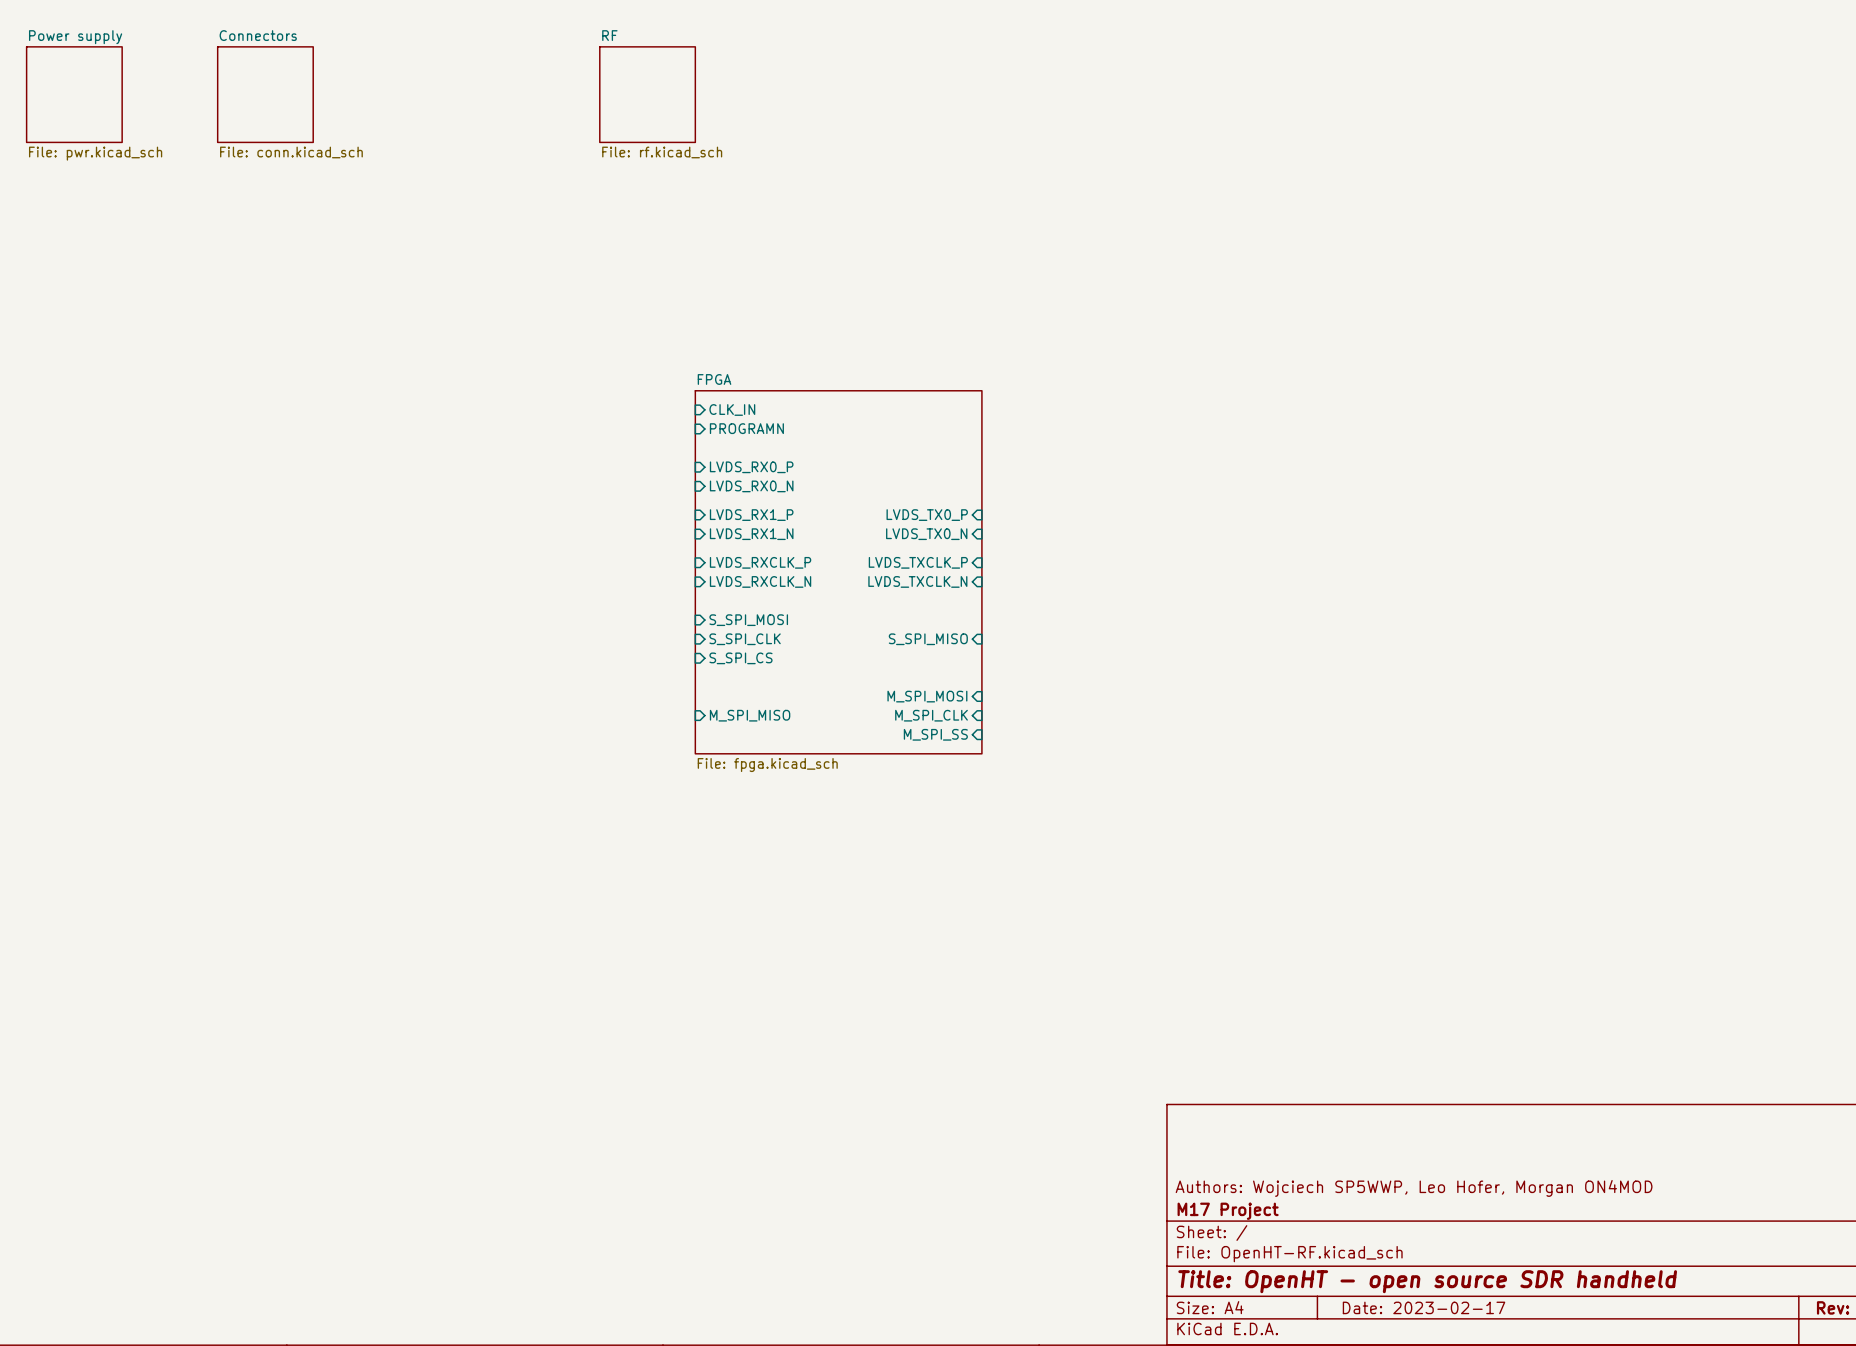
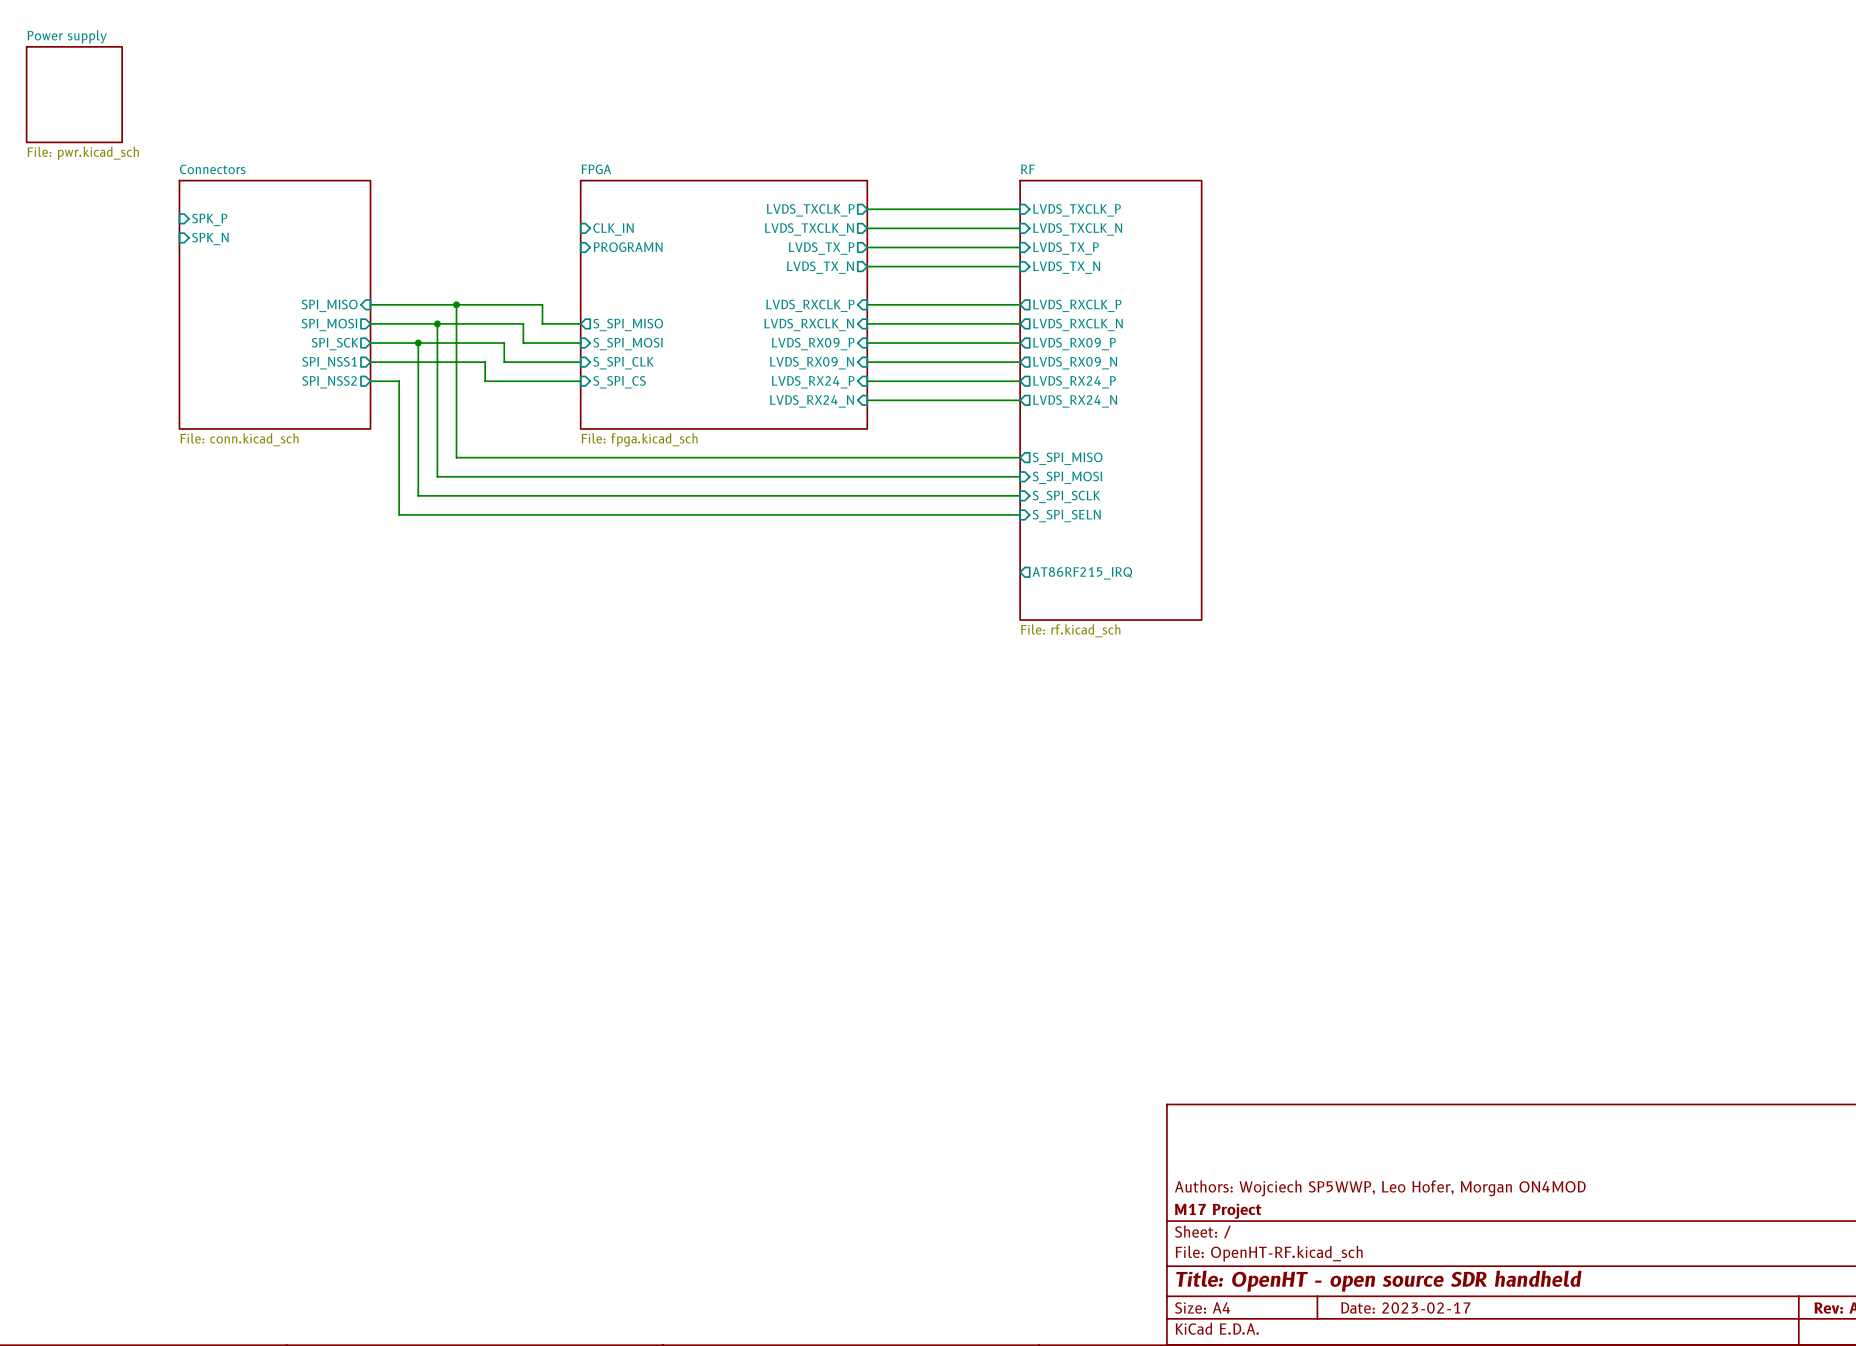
sheet Connectors: File: conn.kicad_sch (265, 94) -> none
sheet RF: File: rf.kicad_sch (647, 94) -> none
sheet pin: none -> LVDS_TXCLK_P (810, 210)
wire: none -> (867, 209) (1020, 209)
sheet pin: none -> LVDS_TXCLK_P (1077, 210)
sheet pin: none -> SPK_P (209, 219)
sheet pin: none -> CLK_IN (613, 229)
sheet pin: none -> LVDS_TXCLK_N (809, 229)
wire: none -> (867, 228) (1020, 228)
sheet pin: none -> LVDS_TXCLK_N (1077, 229)
sheet pin: none -> SPK_N (210, 239)
sheet pin: none -> PROGRAMN (628, 247)
sheet pin: none -> LVDS_TX_P (821, 248)
wire: none -> (867, 247) (1020, 247)
sheet pin: none -> LVDS_TX_P (1066, 248)
sheet pin: none -> LVDS_TX_N (820, 267)
wire: none -> (867, 266) (1020, 266)
sheet pin: none -> LVDS_TX_N (1066, 267)
sheet Connectors: none -> File: conn.kicad_sch (274, 304)
sheet pin: none -> SPI_MISO (329, 305)
wire: none -> (370, 304) (542, 304) (542, 323) (580, 323)
wire: none -> (456, 304) (456, 457) (1020, 457)
junction: none -> (456, 304)
sheet FPGA: none -> File: fpga.kicad_sch (723, 304)
sheet pin: none -> LVDS_RXCLK_P (810, 305)
wire: none -> (867, 304) (1020, 304)
sheet pin: none -> LVDS_RXCLK_P (1077, 305)
wire: none -> (370, 323) (523, 323) (523, 343) (580, 343)
wire: none -> (437, 323) (437, 476) (1020, 476)
junction: none -> (437, 323)
wire: none -> (867, 323) (1020, 323)
sheet pin: none -> SPI_MOSI (329, 324)
sheet pin: none -> S_SPI_MISO (628, 324)
sheet pin: none -> LVDS_RXCLK_N (809, 324)
sheet pin: none -> LVDS_RXCLK_N (1078, 324)
sheet pin: none -> SPI_SCK (335, 344)
wire: none -> (370, 343) (504, 343) (504, 362) (580, 362)
wire: none -> (418, 343) (418, 495) (1020, 495)
junction: none -> (418, 343)
sheet pin: none -> S_SPI_MOSI (627, 344)
sheet pin: none -> LVDS_RX09_P (813, 344)
wire: none -> (867, 343) (1020, 343)
sheet pin: none -> LVDS_RX09_P (1074, 344)
sheet pin: none -> SPI_NSS1 (329, 363)
wire: none -> (370, 362) (485, 362) (485, 381) (580, 381)
sheet pin: none -> S_SPI_CLK (623, 363)
sheet pin: none -> LVDS_RX09_N (811, 363)
wire: none -> (867, 362) (1020, 362)
sheet pin: none -> LVDS_RX09_N (1075, 363)
sheet pin: none -> SPI_NSS2 (329, 382)
wire: none -> (370, 381) (399, 381) (399, 514) (1020, 514)
sheet pin: none -> S_SPI_CS (619, 382)
sheet pin: none -> LVDS_RX24_P (813, 382)
wire: none -> (867, 381) (1020, 381)
sheet pin: none -> LVDS_RX24_P (1074, 382)
sheet pin: none -> LVDS_RX24_N (811, 401)
wire: none -> (867, 400) (1020, 400)
sheet pin: none -> LVDS_RX24_N (1075, 401)
sheet RF: none -> File: rf.kicad_sch (1110, 400)
sheet pin: CLK_IN (732, 409) -> none
sheet pin: PROGRAMN (746, 428) -> none
sheet pin: none -> S_SPI_MISO (1067, 458)
sheet pin: LVDS_RX0_P (751, 467) -> none
sheet pin: none -> S_SPI_MOSI (1067, 477)
sheet pin: LVDS_RX0_N (751, 486) -> none
sheet pin: none -> S_SPI_SCLK (1066, 496)
sheet pin: LVDS_RX1_P (751, 515) -> none
sheet pin: LVDS_TX0_P (927, 515) -> none
sheet pin: none -> S_SPI_SELN (1066, 516)
sheet pin: LVDS_RX1_N (751, 534) -> none
sheet pin: LVDS_TX0_N (926, 534) -> none
sheet pin: LVDS_RXCLK_P (760, 562) -> none
sheet pin: LVDS_TXCLK_P (918, 562) -> none
sheet FPGA: File: fpga.kicad_sch (838, 572) -> none
sheet pin: none -> AT86RF215_IRQ (1082, 573)
sheet pin: LVDS_RXCLK_N (760, 581) -> none
sheet pin: LVDS_TXCLK_N (917, 581) -> none
sheet pin: S_SPI_MOSI (748, 620) -> none
sheet pin: S_SPI_CLK (745, 639) -> none
sheet pin: S_SPI_MISO (928, 639) -> none
sheet pin: S_SPI_CS (740, 658) -> none
sheet pin: M_SPI_MOSI (927, 696) -> none
sheet pin: M_SPI_MISO (750, 715) -> none
sheet pin: M_SPI_CLK (931, 715) -> none
sheet pin: M_SPI_SS (935, 734) -> none

